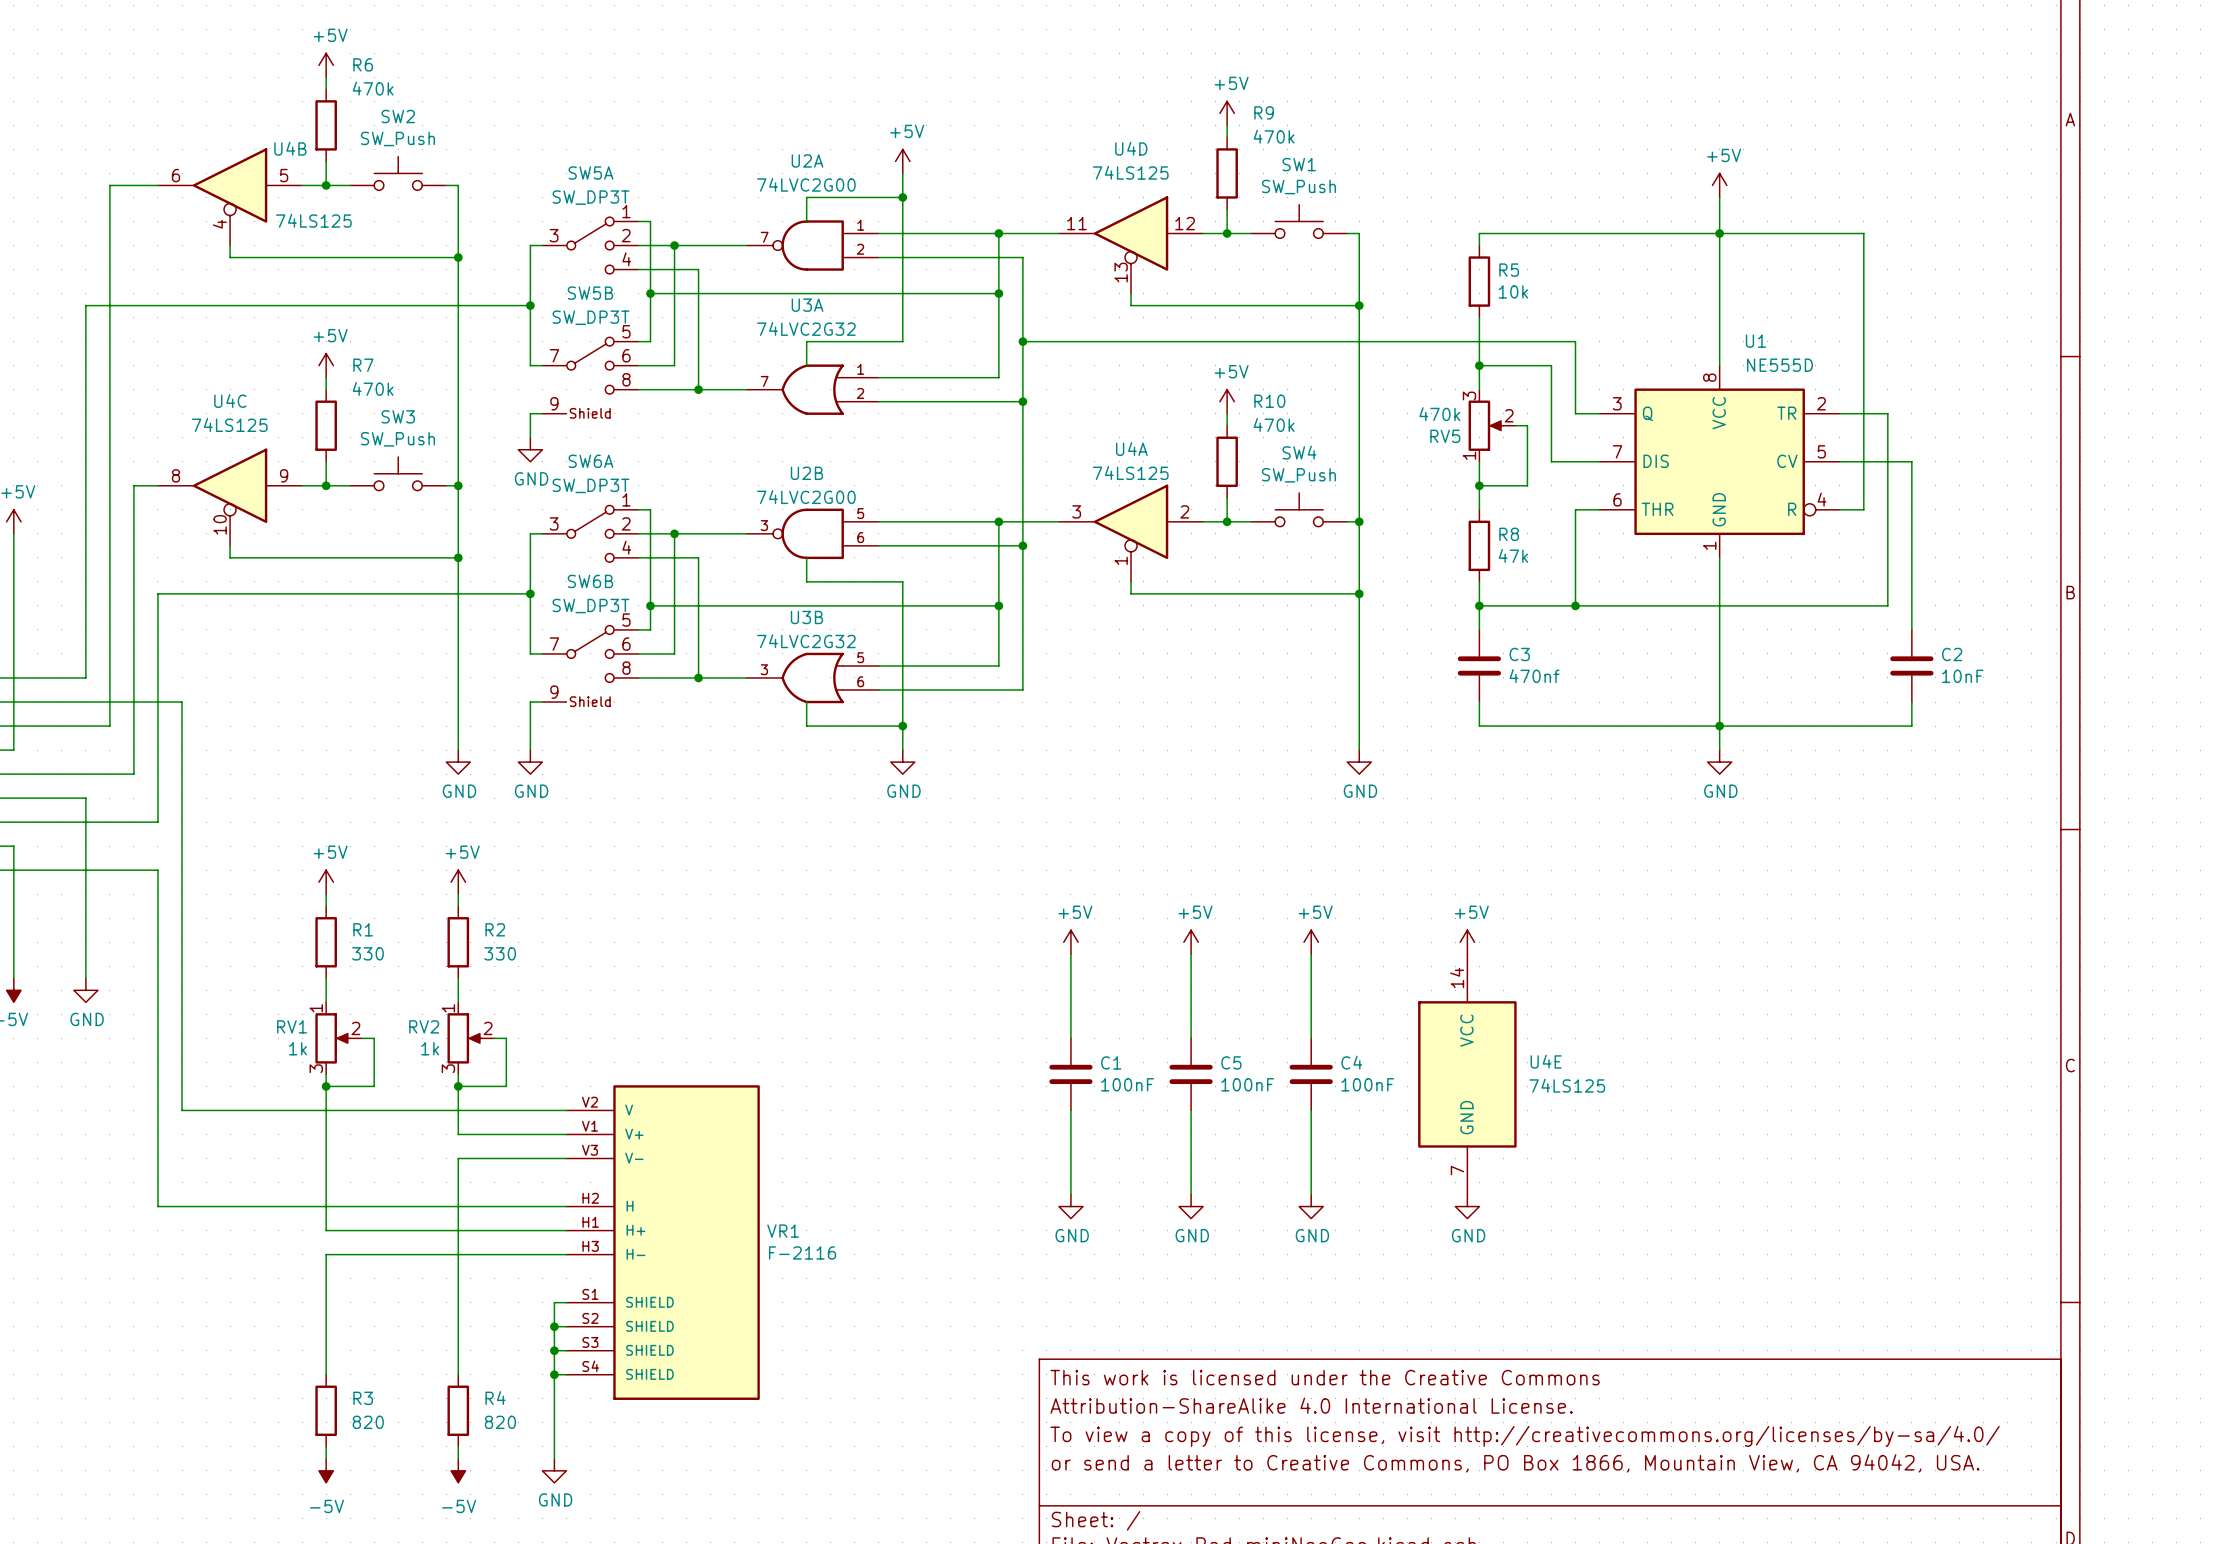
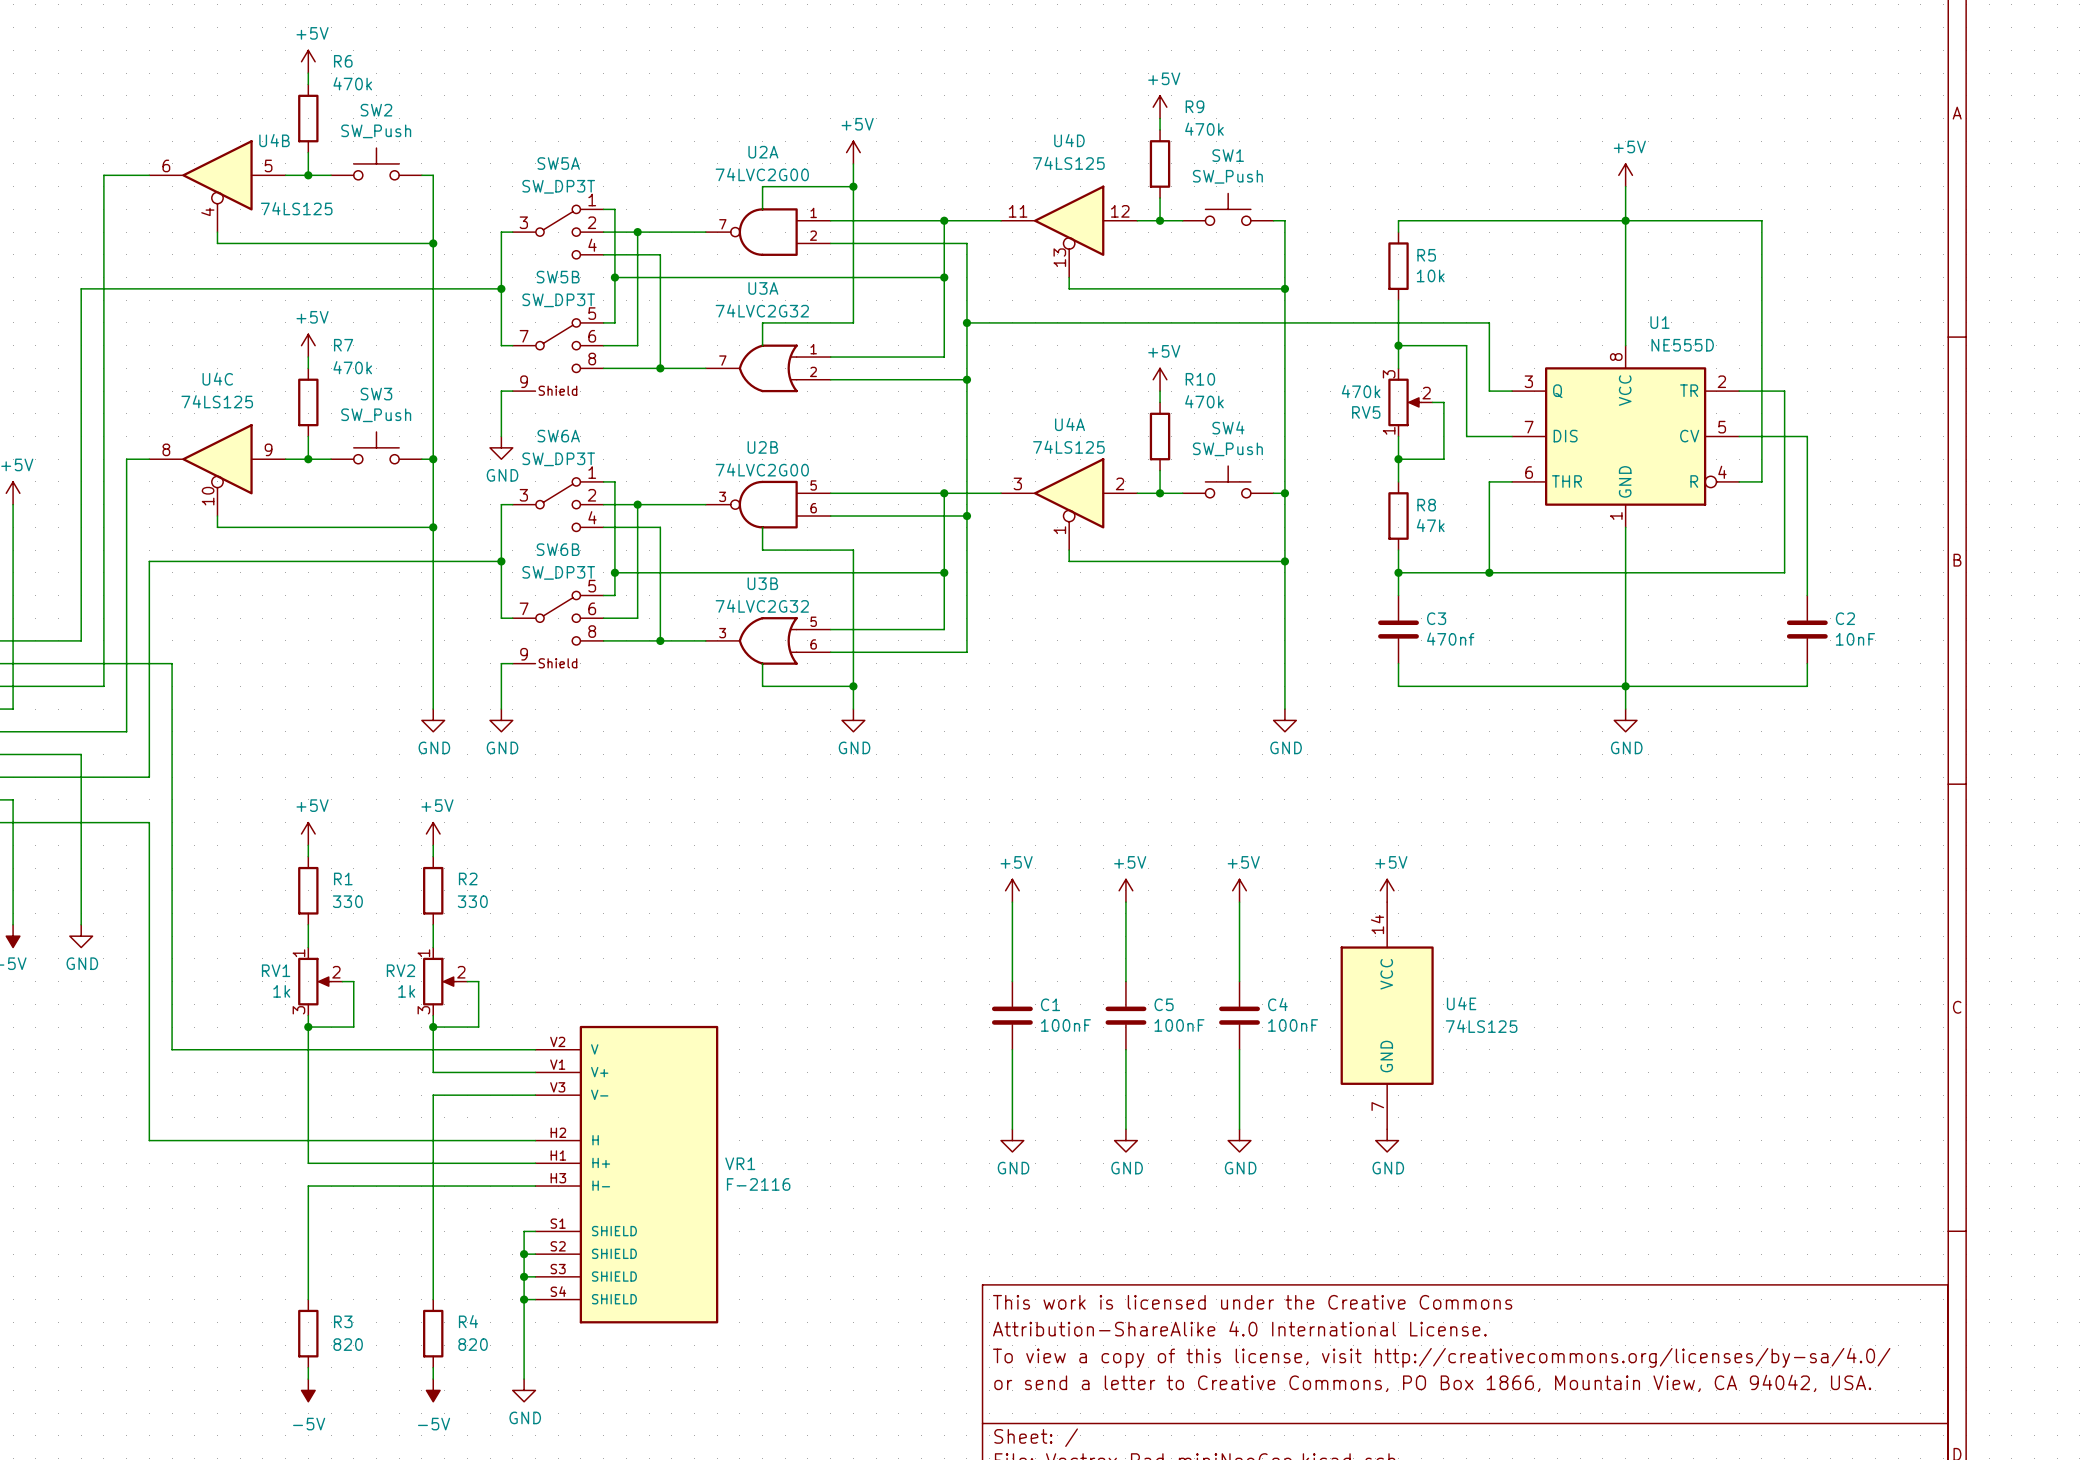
power symbol position: GND (530, 449) -> GND (501, 447)

